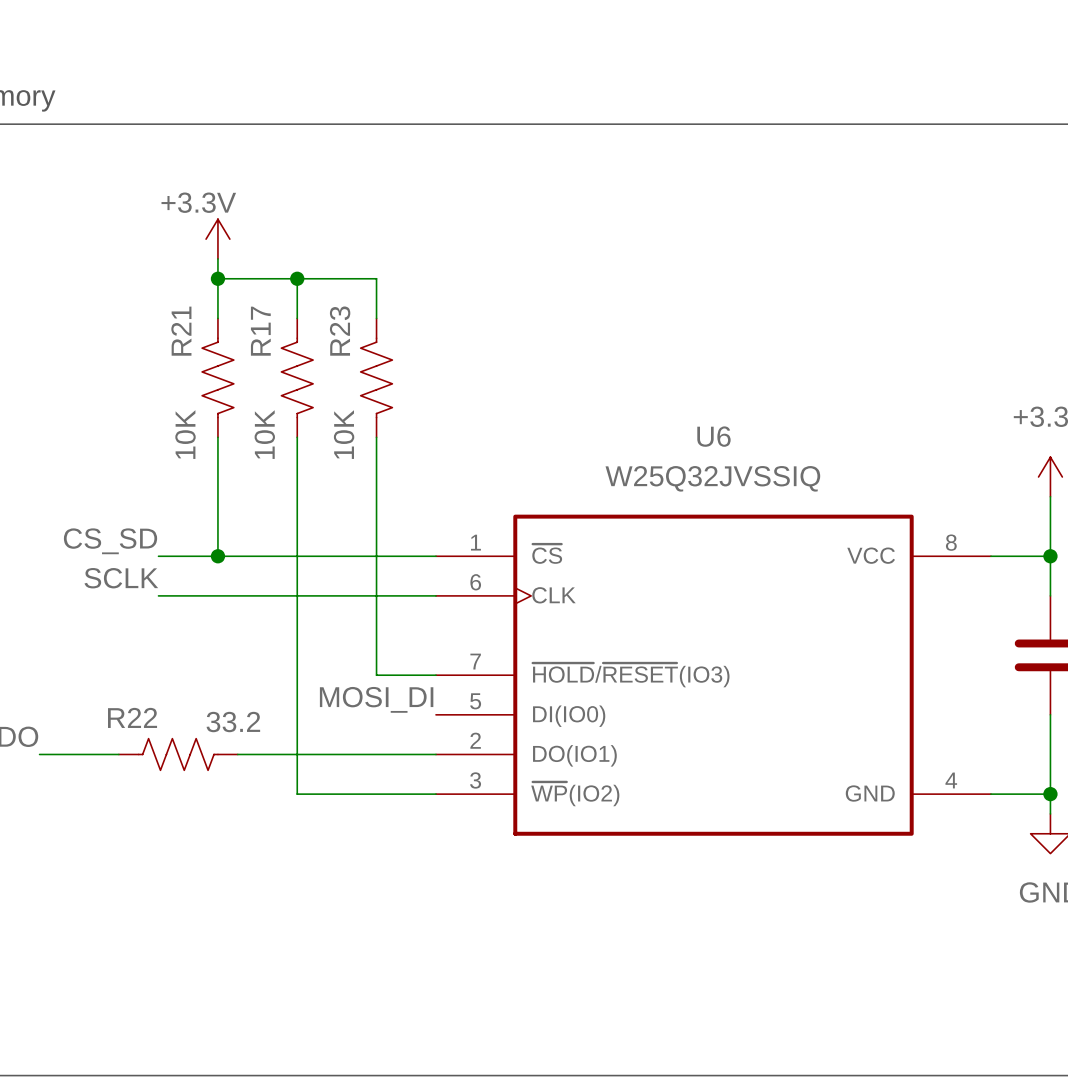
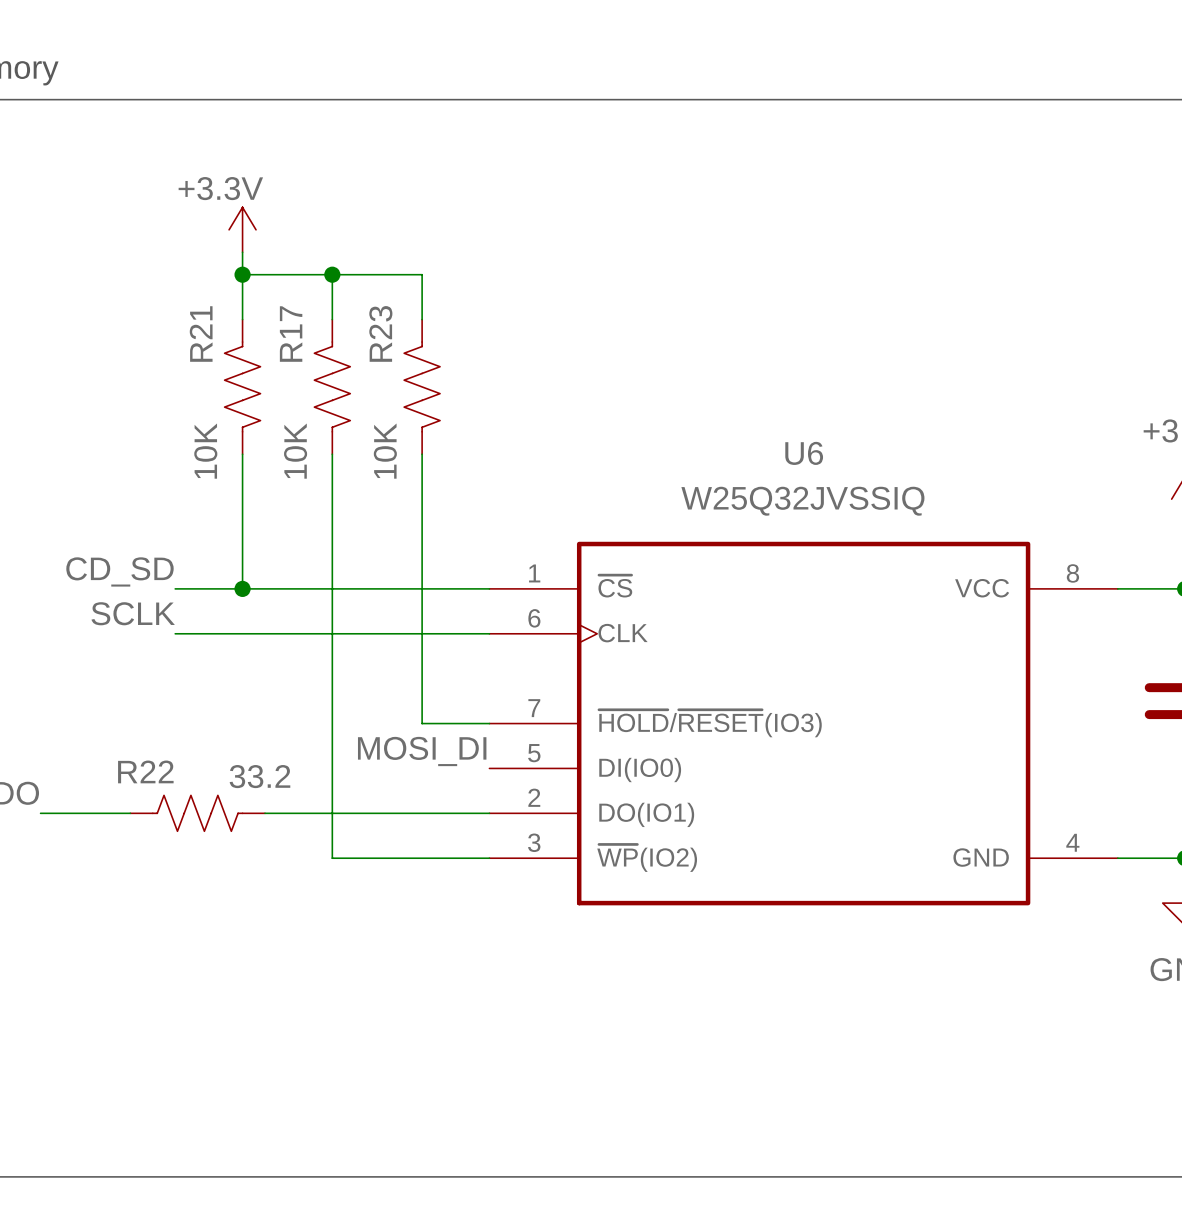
label: CS_SD (110, 541) -> CD_SD (119, 571)

